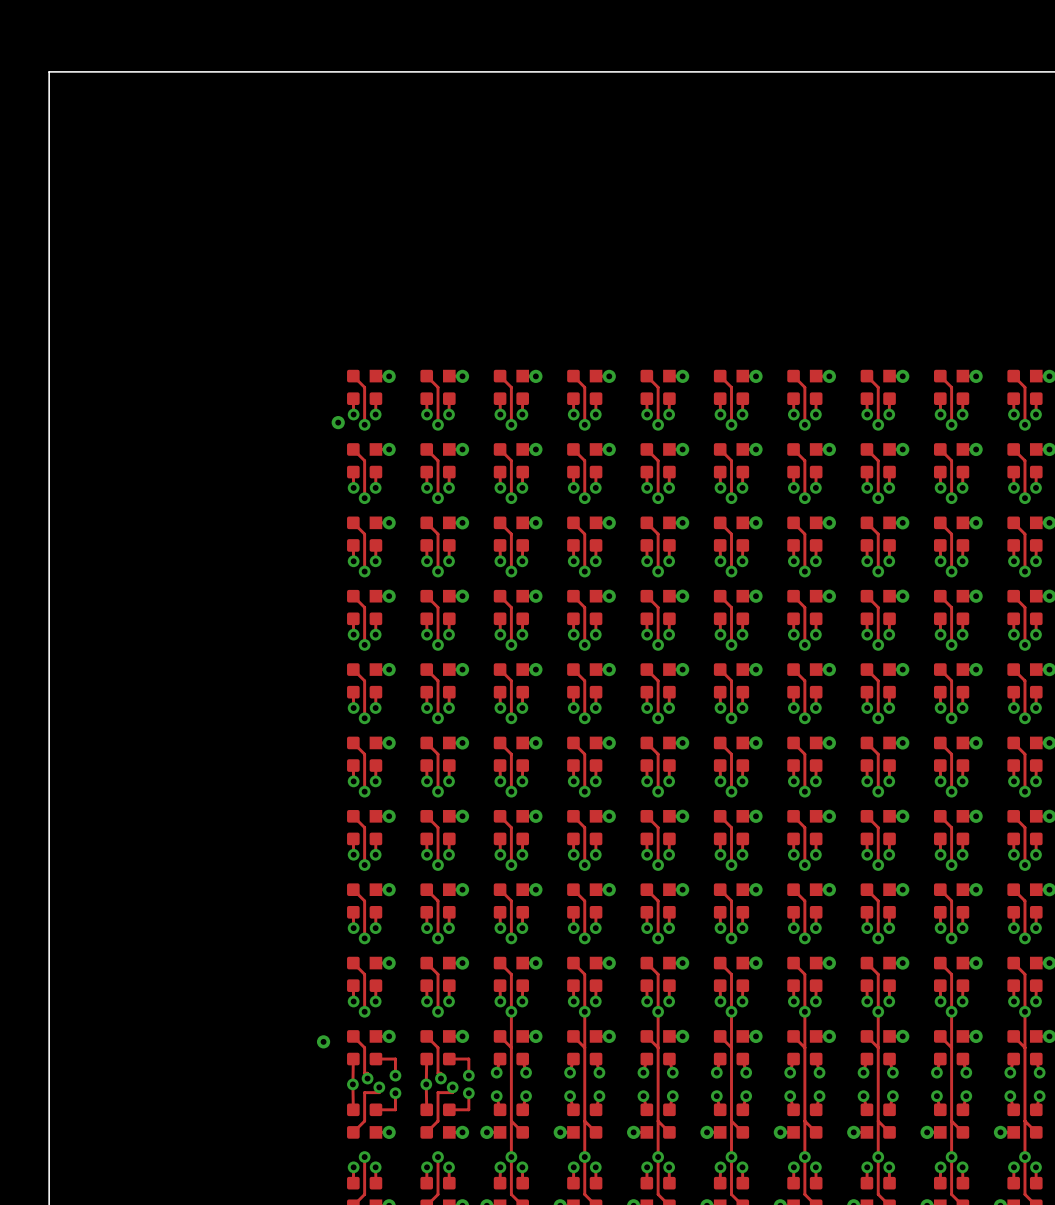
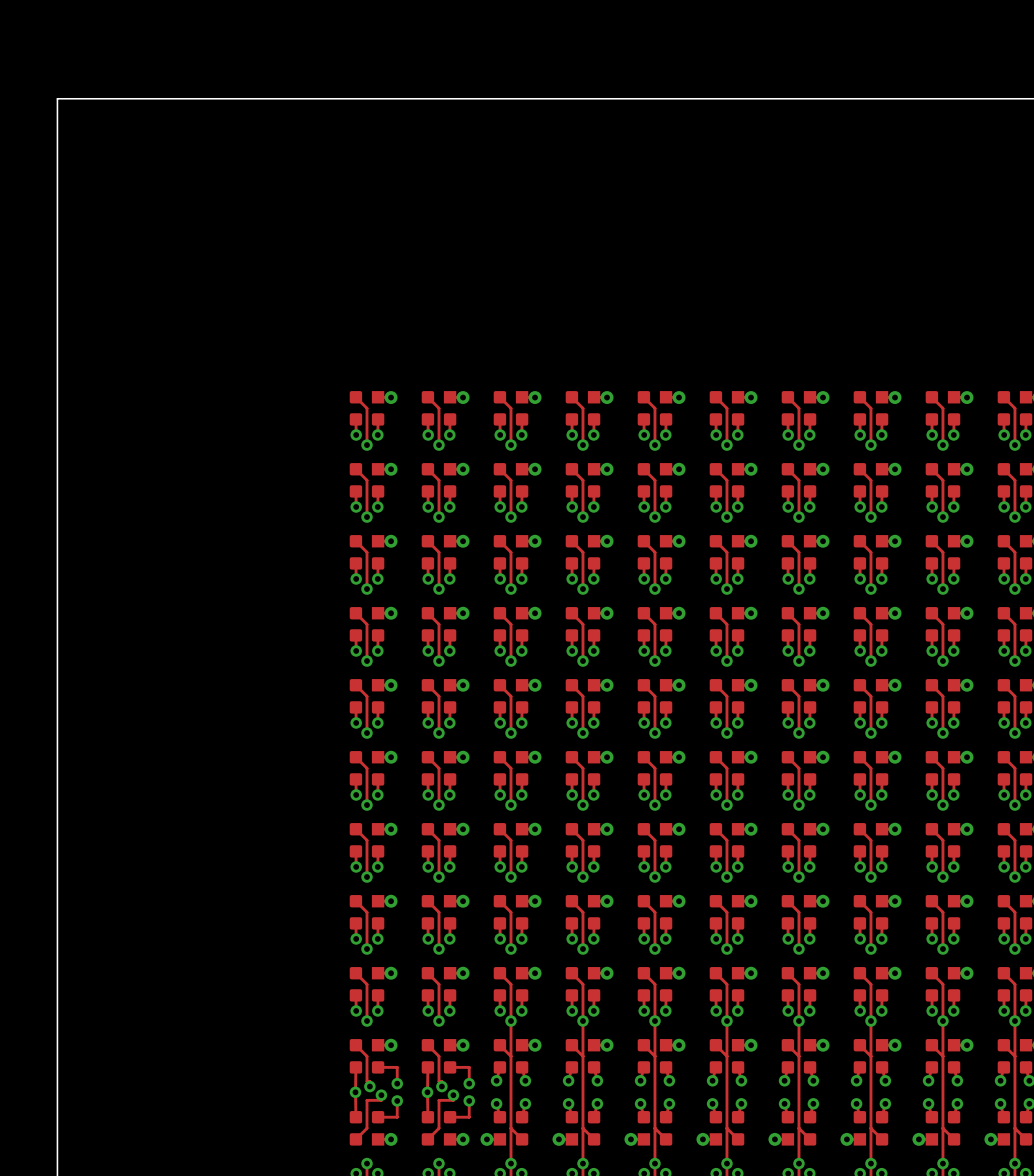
via: (338, 422) -> none
via: (323, 1041) -> none

